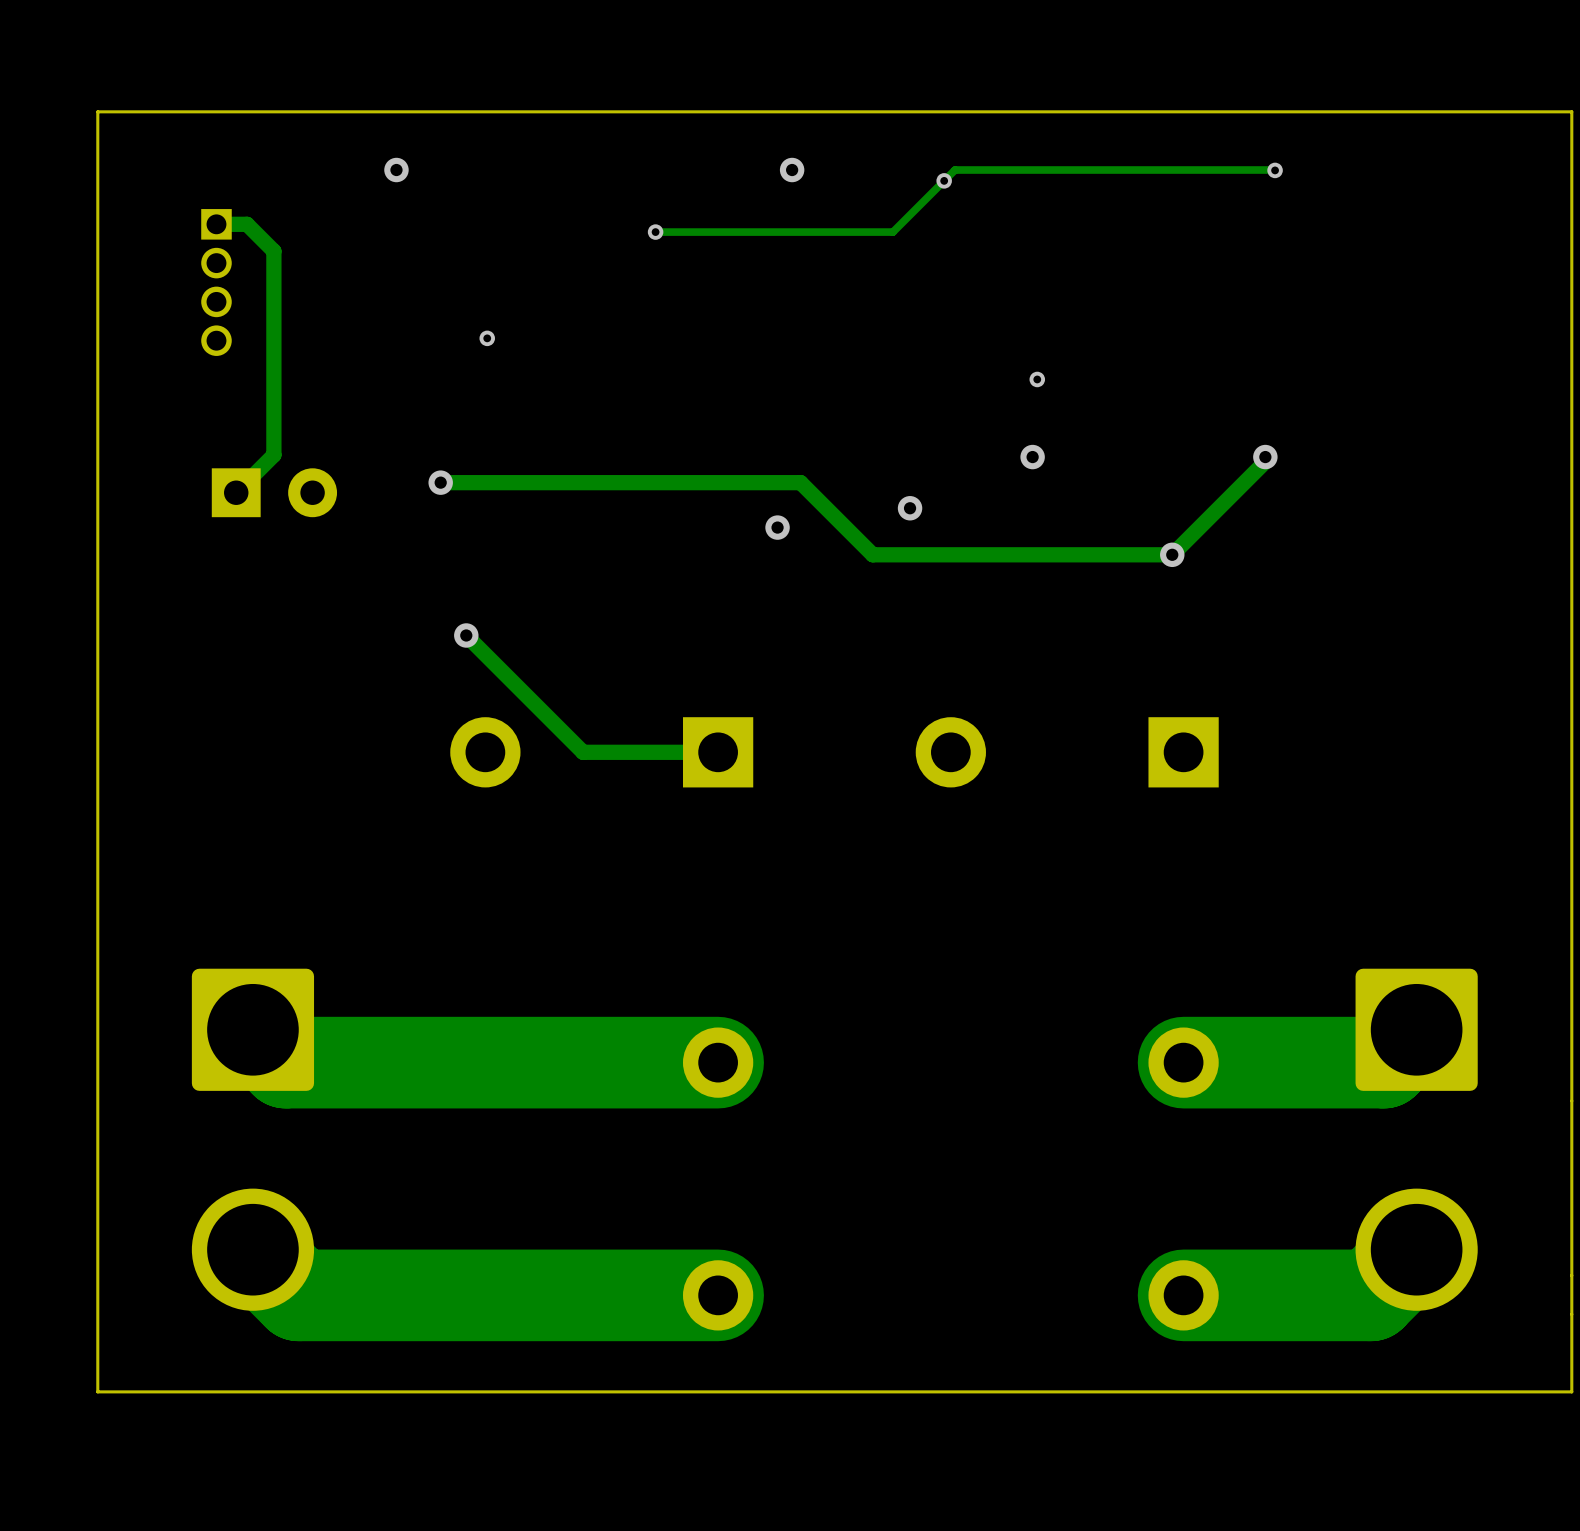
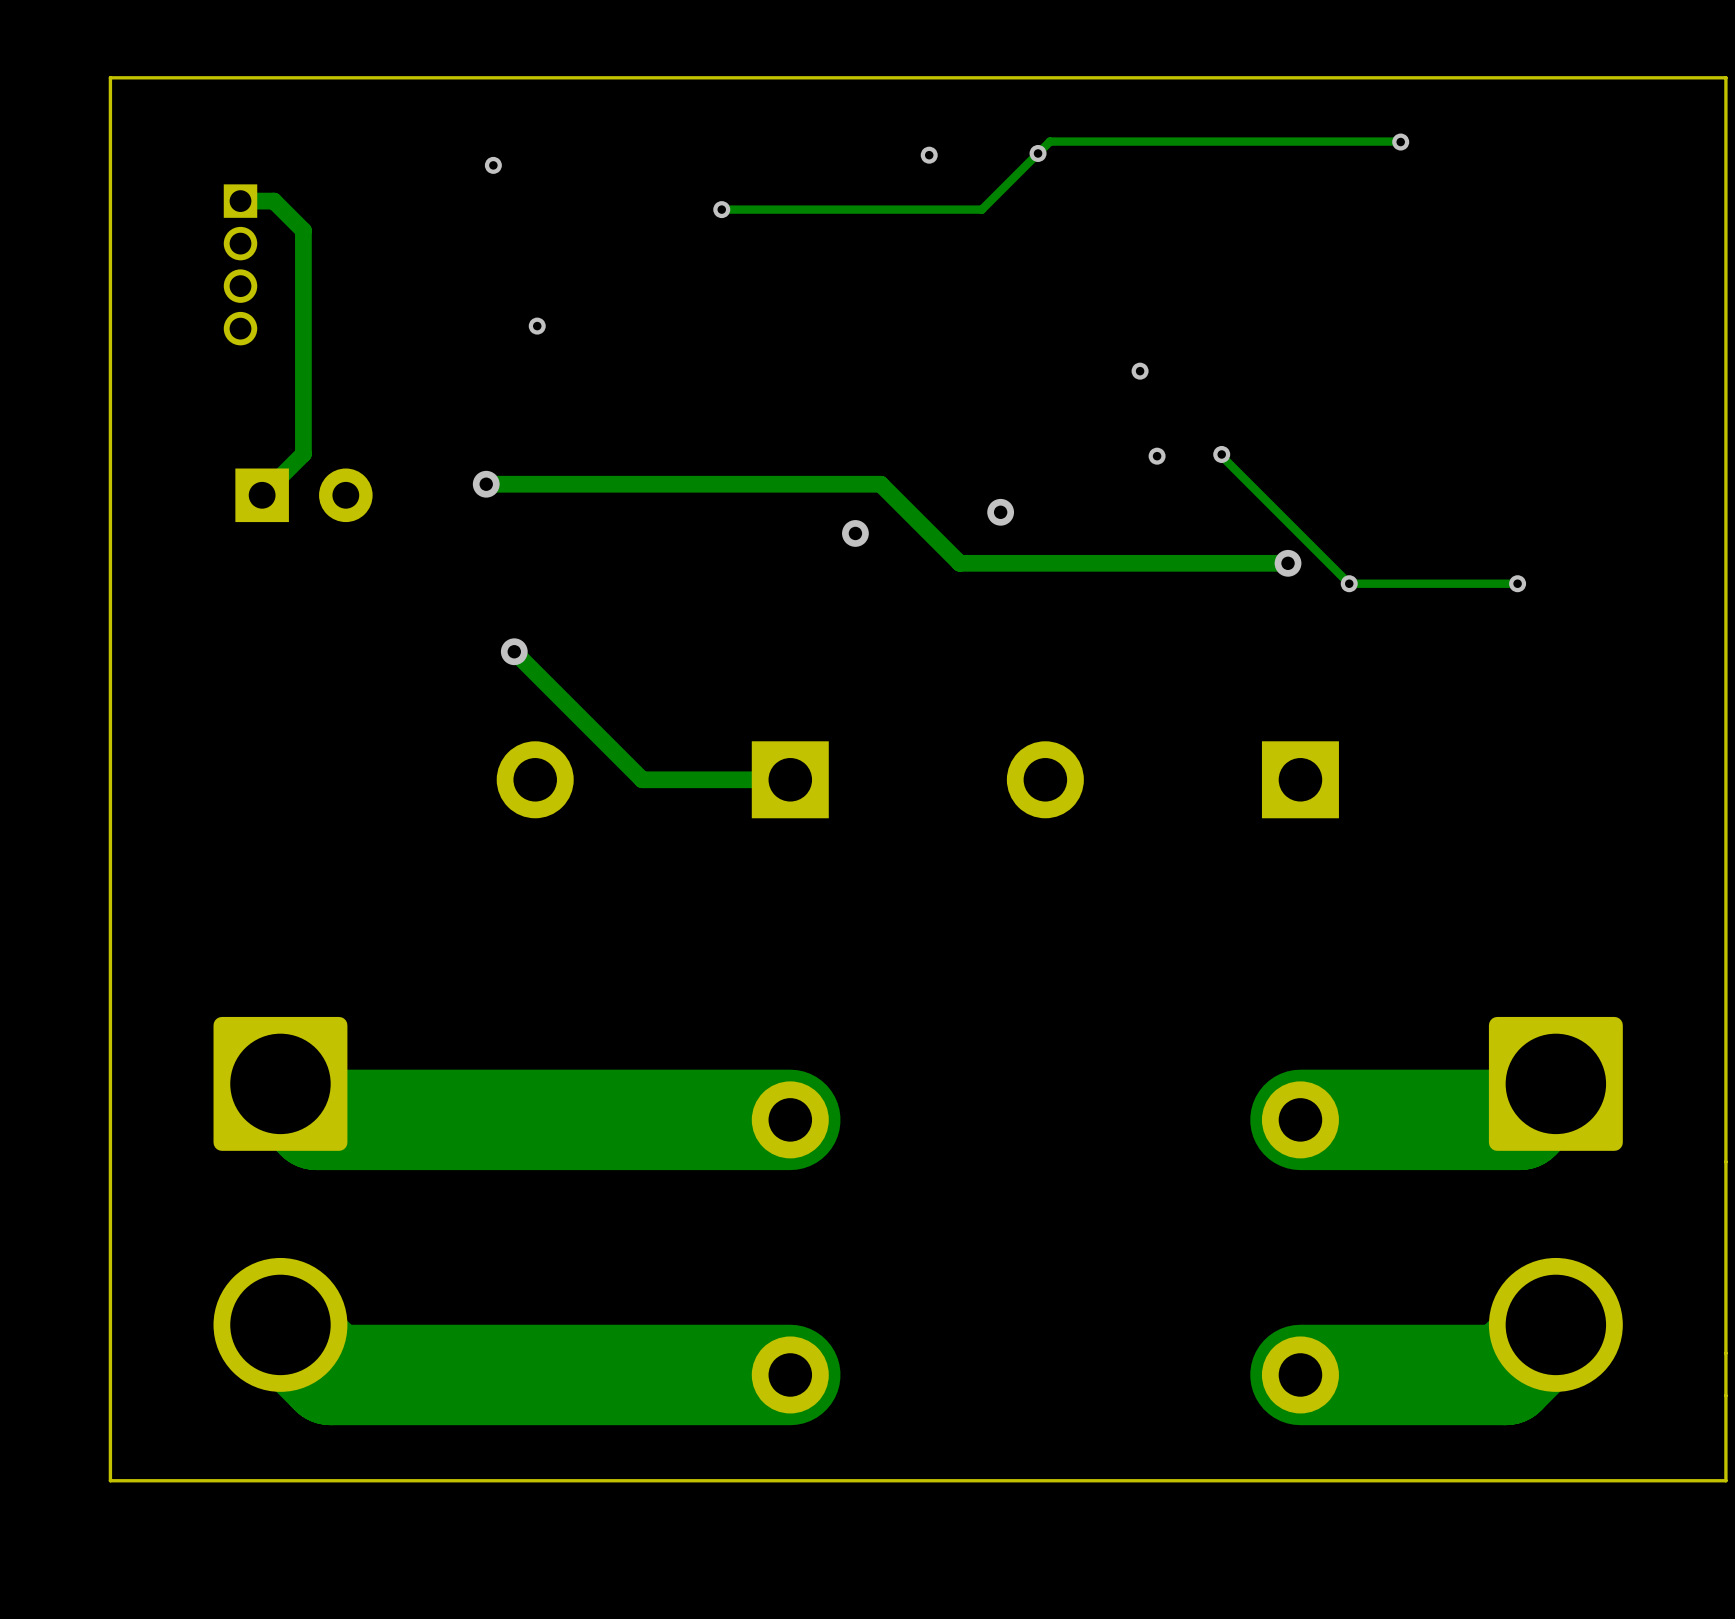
via: (396, 170) -> none
via: (792, 170) -> none
via: none -> (929, 155)
via: none -> (493, 165)
track: none -> (1221, 454) (1349, 583) (1517, 583)
via: none -> (1221, 454)
via: (1032, 457) -> none
via: none -> (1157, 456)
track: (1265, 457) (1265, 461) (1172, 554) -> none
via: (1265, 457) -> none
via: none -> (1349, 583)
via: none -> (1517, 583)

